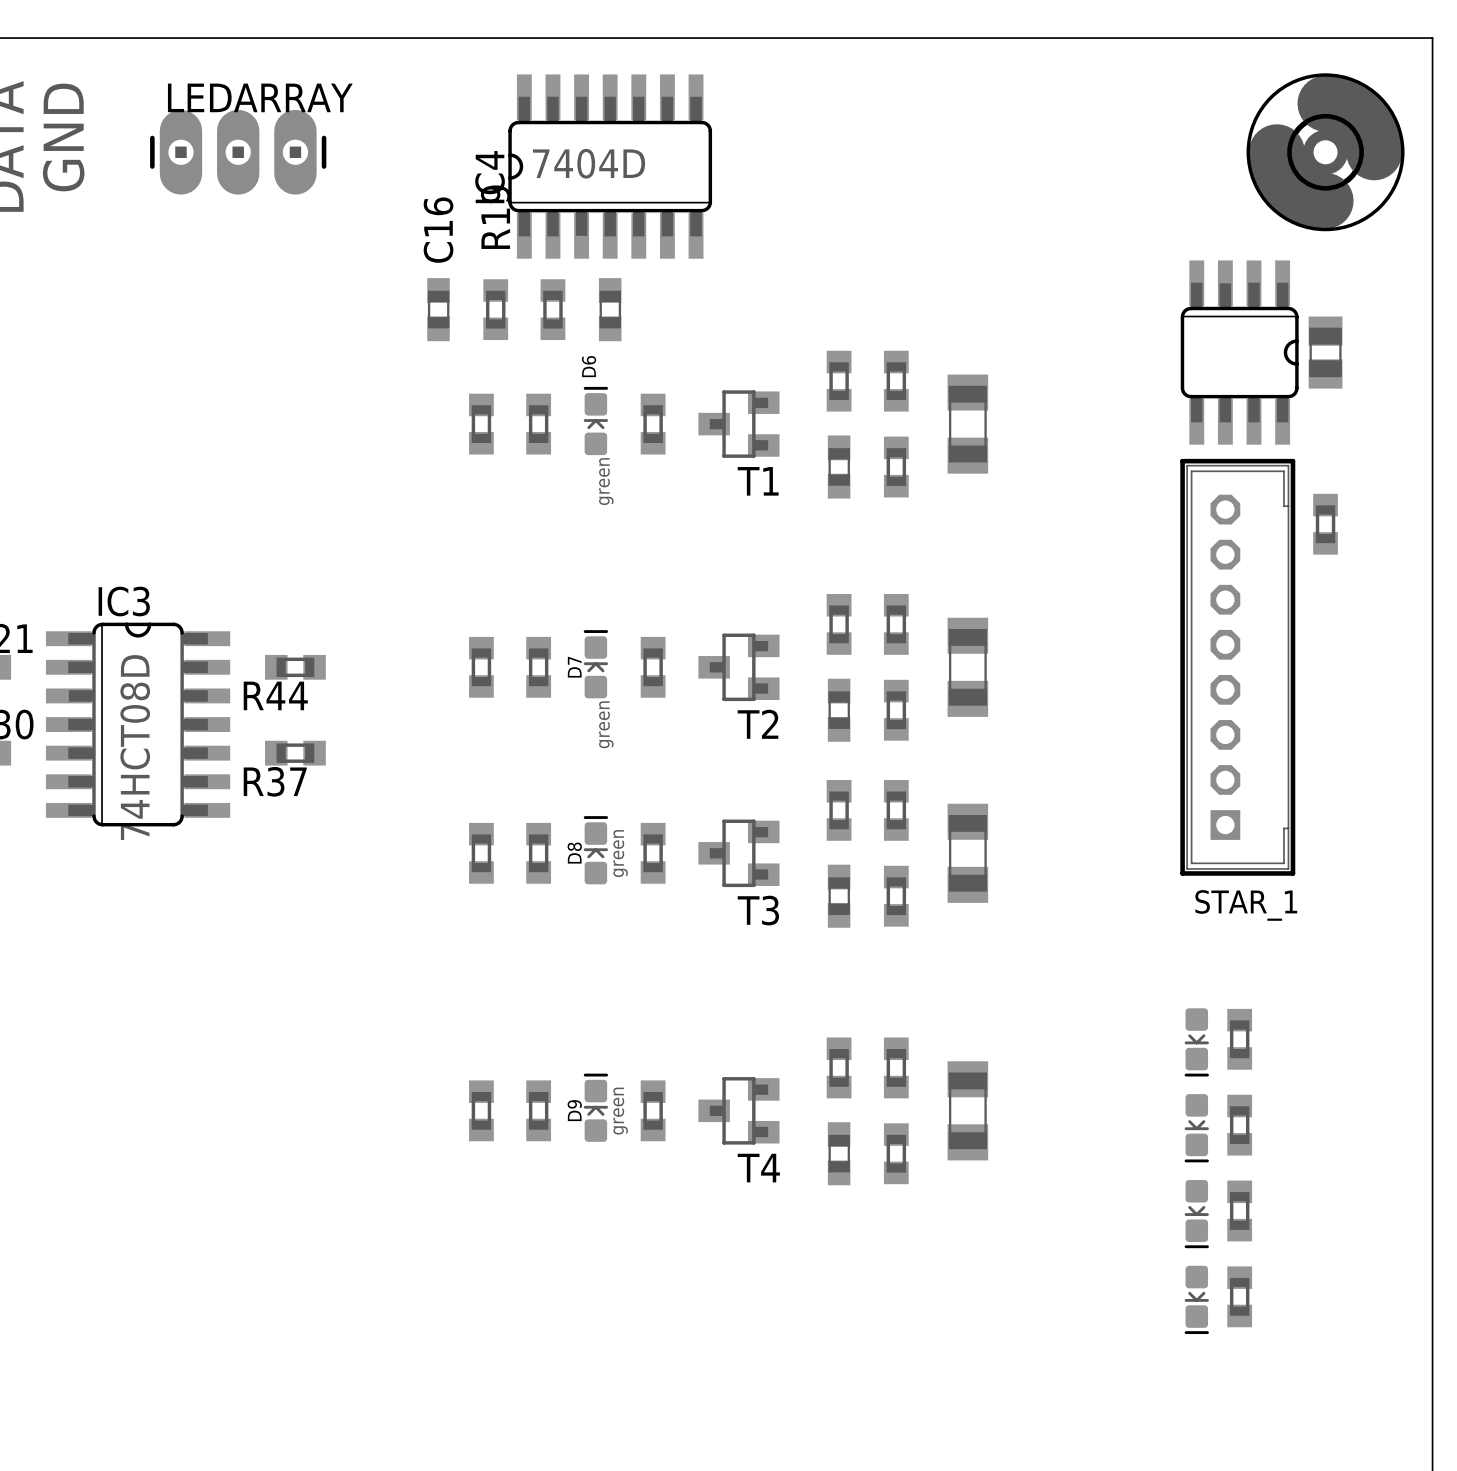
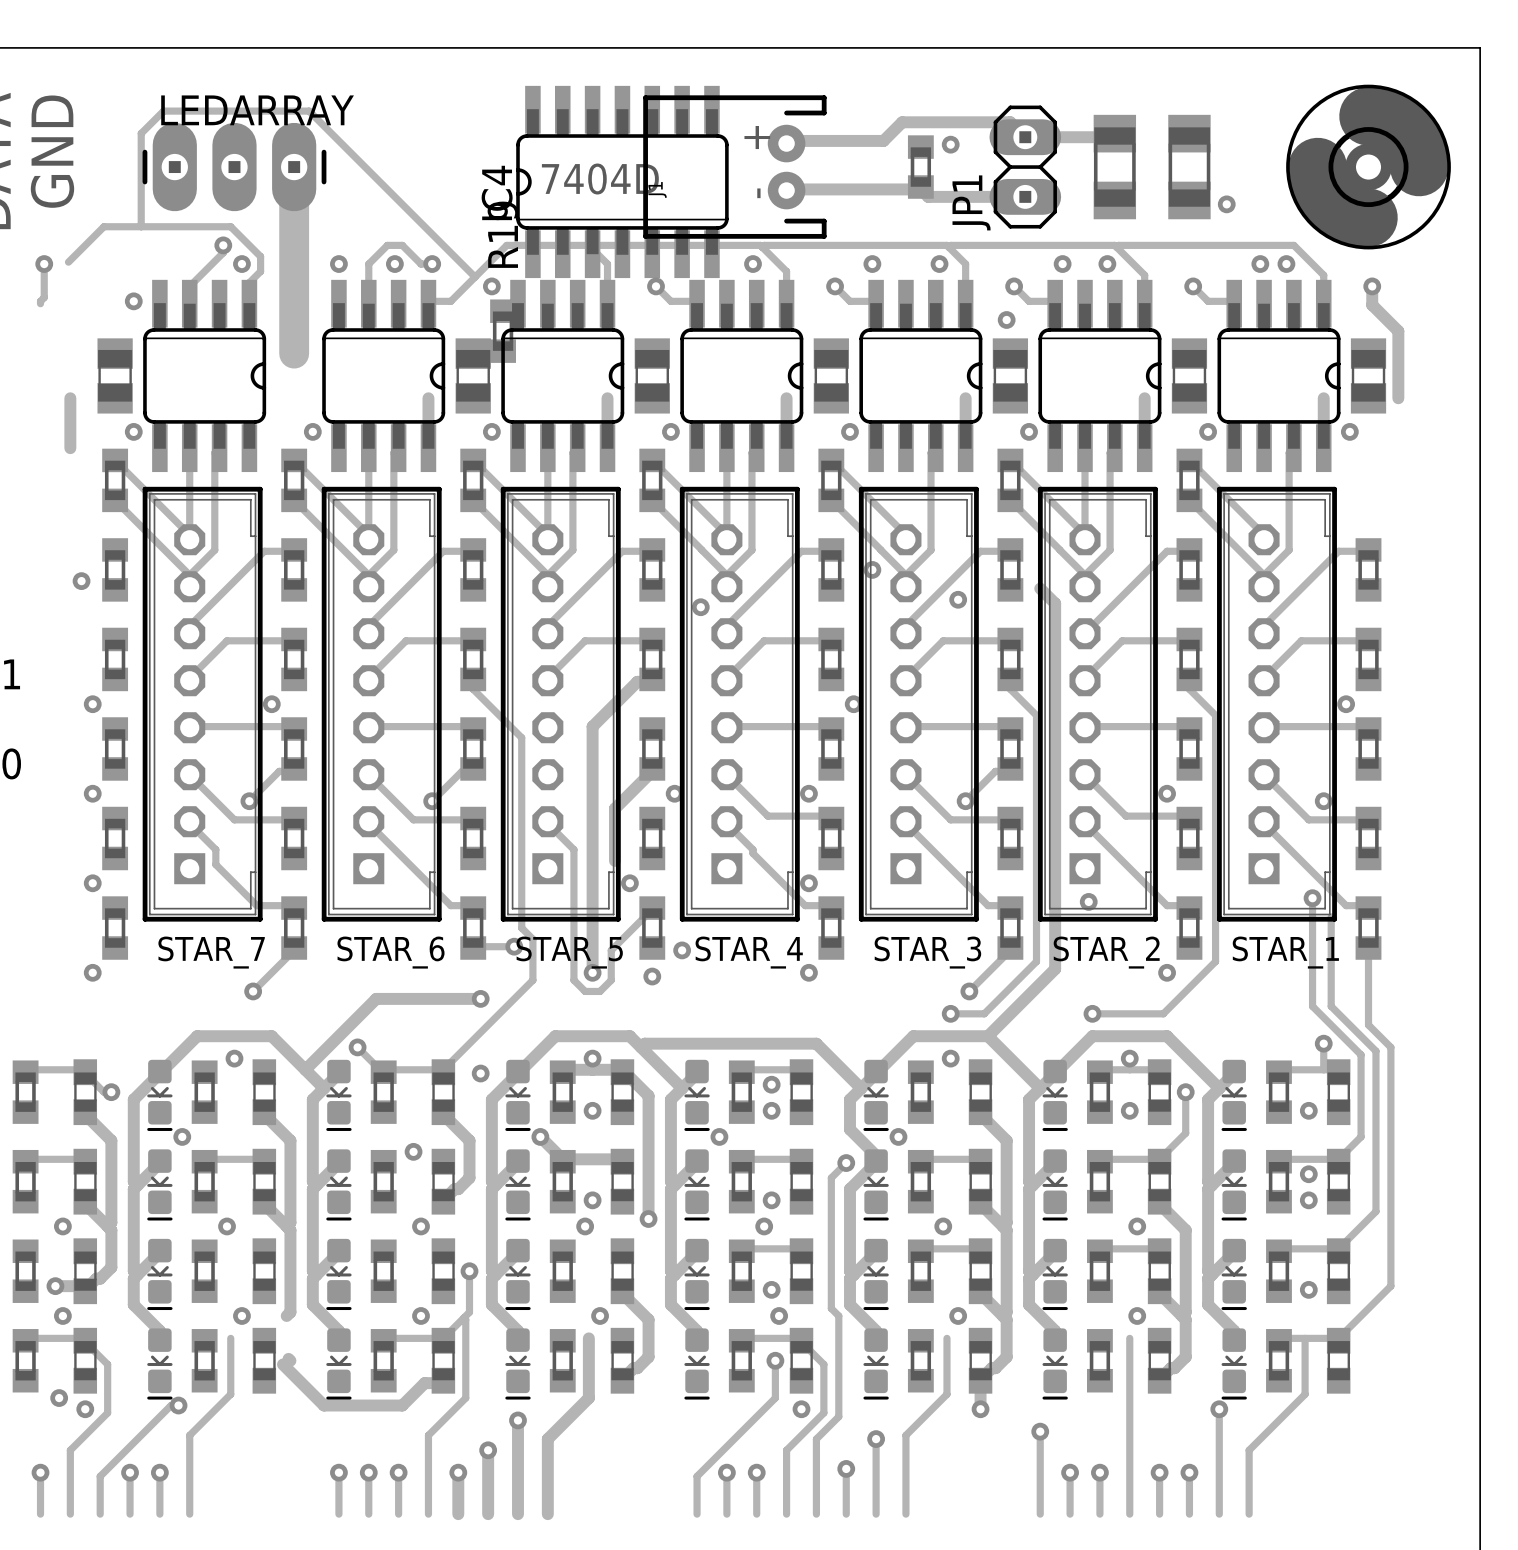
track: none -> (1114, 133) (1111, 137) (1025, 137) (1010, 122) (902, 122) (883, 140) (786, 140) (786, 143)
via: none -> (950, 144)
track: none -> (294, 167) (294, 353)
J1: none -> (734, 167)
part: none -> (920, 167)
JP1: none -> (1025, 167)
part: none -> (1114, 167)
part: none -> (1189, 167)
track: none -> (786, 190) (920, 189) (920, 187) (928, 196) (1025, 196)
via: none -> (1226, 204)
track: none -> (141, 226) (141, 133) (163, 111) (309, 111) (475, 277)
track: none -> (223, 245) (223, 252) (189, 286) (189, 303)
via: none -> (223, 245)
track: none -> (590, 247) (592, 245) (760, 245) (786, 271) (786, 303)
track: none -> (762, 247) (764, 245) (946, 245) (965, 264) (965, 303)
track: none -> (948, 247) (950, 245) (1114, 245) (1144, 275) (1144, 303)
track: none -> (1116, 247) (1118, 245) (1293, 245) (1323, 275) (1323, 303)
track: none -> (68, 262) (103, 226) (230, 226) (260, 256) (260, 271) (249, 282) (249, 303)
track: none -> (44, 264) (44, 297) (40, 303)
via: none -> (44, 264)
via: none -> (241, 264)
via: none -> (338, 264)
via: none -> (394, 264)
track: none -> (432, 264) (421, 264) (402, 245) (387, 245) (368, 264) (368, 303)
via: none -> (432, 264)
via: none -> (753, 264)
via: none -> (872, 264)
via: none -> (939, 264)
via: none -> (1062, 264)
via: none -> (1107, 264)
via: none -> (1260, 264)
via: none -> (1286, 264)
via: none -> (491, 286)
track: none -> (656, 286) (670, 301) (697, 301) (697, 303)
via: none -> (656, 286)
track: none -> (835, 286) (849, 301) (876, 301) (876, 303)
via: none -> (835, 286)
track: none -> (1014, 286) (1029, 301) (1055, 301) (1055, 303)
via: none -> (1014, 286)
track: none -> (1193, 286) (1208, 301) (1234, 301) (1234, 303)
via: none -> (1193, 286)
track: none -> (1372, 286) (1372, 305) (1398, 331) (1398, 398)
via: none -> (1372, 286)
via: none -> (133, 301)
track: none -> (428, 303) (428, 301) (450, 301) (506, 245) (588, 245) (607, 264) (607, 303)
via: none -> (1006, 319)
C16: (438, 309) -> none
part: (552, 309) -> none
part: (610, 309) -> none
part: none -> (115, 375)
part: none -> (204, 375)
part: none -> (383, 375)
part: none -> (473, 375)
part: none -> (562, 375)
part: none -> (652, 375)
part: none -> (741, 375)
part: none -> (831, 375)
part: none -> (920, 375)
part: none -> (1010, 375)
part: none -> (1099, 375)
part: none -> (1189, 375)
track: none -> (70, 398) (70, 448)
track: none -> (428, 398) (428, 448)
track: none -> (607, 398) (607, 448)
track: none -> (786, 398) (786, 448)
track: none -> (965, 398) (965, 448)
track: none -> (1144, 398) (1144, 448)
track: none -> (1323, 398) (1323, 448)
part: (839, 381) -> none
part: (896, 381) -> none
via: none -> (133, 431)
via: none -> (312, 431)
via: none -> (491, 431)
via: none -> (670, 431)
via: none -> (849, 431)
via: none -> (1029, 431)
via: none -> (1208, 431)
via: none -> (1349, 431)
track: none -> (189, 448) (189, 539)
track: none -> (219, 448) (214, 452) (214, 550) (189, 575)
track: none -> (368, 448) (368, 539)
track: none -> (398, 448) (393, 452) (393, 550) (368, 575)
track: none -> (547, 448) (547, 539)
track: none -> (577, 448) (572, 452) (572, 550) (547, 575)
D6: green (595, 421) -> none
track: none -> (726, 448) (726, 539)
track: none -> (756, 448) (751, 452) (751, 550) (726, 575)
track: none -> (935, 448) (931, 452) (931, 550) (905, 575)
track: none -> (1085, 448) (1085, 539)
track: none -> (1114, 448) (1110, 452) (1110, 550) (1085, 575)
track: none -> (1293, 448) (1289, 452) (1289, 550) (1264, 575)
part position: (481, 424) -> (473, 480)
part: (538, 424) -> none
part position: (653, 424) -> (652, 480)
T1: (738, 424) -> none
part: (967, 424) -> none
track: none -> (115, 460) (189, 535)
track: none -> (294, 460) (368, 535)
track: none -> (473, 460) (547, 535)
track: none -> (652, 460) (726, 535)
track: none -> (831, 460) (905, 535)
track: none -> (1010, 460) (1085, 535)
track: none -> (1189, 460) (1264, 535)
part: none -> (115, 480)
part: none -> (294, 480)
part: none -> (831, 480)
part: none -> (1010, 480)
part: none -> (1189, 480)
part: (839, 467) -> none
part: (896, 467) -> none
track: none -> (115, 500) (189, 575)
track: none -> (294, 500) (368, 575)
track: none -> (473, 500) (547, 575)
track: none -> (652, 500) (701, 549)
track: none -> (831, 500) (880, 549)
track: none -> (1010, 500) (1059, 549)
track: none -> (1189, 500) (1264, 575)
track: none -> (294, 549) (264, 551) (189, 625) (189, 633)
track: none -> (473, 549) (443, 551) (368, 625) (368, 633)
track: none -> (652, 549) (622, 551) (547, 625) (547, 633)
track: none -> (701, 550) (726, 575)
track: none -> (831, 549) (801, 551) (726, 625) (726, 633)
track: none -> (880, 550) (905, 575)
track: none -> (1010, 549) (980, 551) (905, 625) (905, 633)
track: none -> (1059, 550) (1085, 575)
track: none -> (1189, 549) (1167, 551) (1085, 633)
track: none -> (1368, 549) (1338, 551) (1264, 625) (1264, 633)
part position: (1325, 524) -> (1368, 569)
part: none -> (115, 569)
part: none -> (294, 569)
part: none -> (473, 569)
part: none -> (652, 569)
part: none -> (831, 569)
via: none -> (872, 569)
part: none -> (1010, 569)
part: none -> (1189, 569)
via: none -> (81, 581)
track: none -> (1040, 588) (1055, 603) (1055, 969) (988, 1036)
via: none -> (958, 599)
via: none -> (700, 607)
track: none -> (294, 639) (227, 640) (189, 678) (189, 680)
track: none -> (473, 639) (406, 640) (368, 678) (368, 680)
track: none -> (652, 639) (585, 640) (547, 678) (547, 680)
track: none -> (831, 639) (764, 640) (726, 678) (726, 680)
track: none -> (1010, 639) (943, 640) (905, 678) (905, 680)
track: none -> (1189, 639) (1122, 640) (1085, 678) (1085, 680)
track: none -> (1368, 639) (1301, 640) (1264, 678) (1264, 680)
part: none -> (115, 659)
part: none -> (294, 659)
part: none -> (473, 659)
part: none -> (652, 659)
part position: (839, 624) -> (831, 659)
part: (896, 624) -> none
part: none -> (1010, 659)
part: none -> (1189, 659)
part: none -> (1368, 659)
track: none -> (473, 679) (473, 689) (521, 737) (521, 928) (532, 939) (532, 980) (443, 1069)
track: none -> (652, 679) (652, 681) (637, 681) (592, 726) (592, 972)
track: none -> (1010, 679) (1010, 689) (1036, 715) (1036, 961) (984, 1013) (950, 1013)
track: none -> (1189, 679) (1189, 689) (1215, 715) (1215, 961) (1163, 1013) (1092, 1013)
D7: green (595, 664) -> none
via: none -> (92, 704)
STAR_7: none -> (202, 704)
via: none -> (271, 704)
R44: (295, 667) -> none
STAR_6: none -> (381, 704)
part: (481, 667) -> none
part: (538, 667) -> none
STAR_5: none -> (560, 704)
part: (653, 667) -> none
STAR_4: none -> (739, 704)
T2: (738, 667) -> none
via: none -> (853, 704)
STAR_3: none -> (918, 704)
part: (967, 667) -> none
STAR_2: none -> (1097, 704)
via: none -> (1346, 704)
track: none -> (189, 727) (294, 726) (294, 729)
track: none -> (368, 727) (473, 726) (473, 729)
track: none -> (726, 727) (831, 726) (831, 729)
track: none -> (905, 727) (1010, 726) (1010, 729)
track: none -> (1085, 727) (1189, 726) (1189, 729)
track: none -> (1264, 727) (1368, 726) (1368, 729)
part: none -> (115, 748)
part: none -> (294, 748)
part: none -> (473, 748)
part: none -> (652, 748)
part: none -> (831, 748)
part: (839, 710) -> none
part: (896, 710) -> none
part: none -> (1010, 748)
part: none -> (1189, 748)
part: none -> (1368, 748)
IC3: 74HCT08D (138, 724) -> none
track: none -> (294, 768) (294, 771) (279, 771) (249, 801)
track: none -> (473, 768) (473, 771) (462, 771) (432, 801)
track: none -> (652, 768) (652, 771) (614, 808) (614, 860)
track: none -> (1010, 768) (1010, 771) (995, 771) (965, 801)
track: none -> (189, 775) (234, 819) (294, 818)
track: none -> (368, 775) (413, 819) (473, 818)
track: none -> (726, 775) (767, 816) (831, 816) (831, 818)
track: none -> (905, 775) (950, 819) (1010, 818)
track: none -> (1085, 775) (1126, 816) (1189, 816) (1189, 818)
track: none -> (1264, 775) (1308, 819) (1368, 818)
via: none -> (92, 793)
R37: (295, 753) -> none
via: none -> (674, 793)
via: none -> (808, 793)
via: none -> (1167, 793)
via: none -> (249, 801)
via: none -> (432, 801)
via: none -> (965, 801)
via: none -> (1323, 801)
track: none -> (189, 821) (215, 849) (215, 864) (256, 905) (294, 905) (294, 908)
track: none -> (368, 821) (450, 905) (473, 905) (473, 908)
track: none -> (547, 821) (573, 849) (573, 980) (585, 991) (600, 991) (611, 980) (611, 950) (652, 908)
track: none -> (726, 821) (753, 849) (753, 853) (805, 905) (831, 905) (831, 908)
track: none -> (905, 821) (988, 905) (1010, 905) (1010, 908)
track: none -> (1085, 821) (1167, 905) (1189, 905) (1189, 908)
track: none -> (1264, 821) (1346, 905) (1368, 905) (1368, 908)
part: none -> (115, 838)
part: none -> (294, 838)
part: none -> (473, 838)
part: none -> (652, 838)
part: none -> (1010, 838)
part: none -> (1189, 838)
part: none -> (1368, 838)
part position: (839, 810) -> (831, 838)
part: (896, 810) -> none
via: none -> (92, 883)
via: none -> (629, 883)
via: none -> (808, 883)
D8: green (595, 850) -> none
part: (481, 853) -> none
part: (538, 853) -> none
part: (653, 853) -> none
T3: (738, 853) -> none
part: (967, 853) -> none
track: none -> (1312, 898) (1312, 1006) (1361, 1054) (1361, 1136) (1338, 1159)
via: none -> (1312, 898)
via: none -> (1088, 901)
track: none -> (1331, 916) (1331, 1006) (1375, 1051) (1375, 1211) (1338, 1248)
part: none -> (115, 928)
part: none -> (294, 928)
part: none -> (473, 928)
part: none -> (652, 928)
part: none -> (831, 928)
part: none -> (1010, 928)
part: none -> (1189, 928)
part: none -> (1368, 928)
part: (839, 896) -> none
part: (896, 896) -> none
track: none -> (514, 946) (473, 948)
via: none -> (514, 946)
track: none -> (294, 948) (294, 950) (253, 991)
track: none -> (1010, 948) (1010, 950) (969, 991)
track: none -> (1368, 948) (1368, 1025) (1390, 1047) (1390, 1286) (1338, 1338)
via: none -> (682, 950)
via: none -> (92, 972)
via: none -> (592, 972)
via: none -> (808, 972)
via: none -> (1167, 972)
via: none -> (652, 976)
via: none -> (253, 991)
via: none -> (969, 991)
track: none -> (480, 998) (376, 998) (305, 1069)
via: none -> (480, 998)
via: none -> (950, 1013)
via: none -> (1092, 1013)
track: none -> (988, 1036) (913, 1036) (849, 1099) (849, 1129) (876, 1155) (876, 1163) (849, 1189) (849, 1271) (853, 1274)
track: none -> (988, 1036) (1040, 1088)
track: none -> (1323, 1043) (1323, 1069)
via: none -> (1323, 1043)
track: none -> (357, 1047) (383, 1073) (383, 1069) (443, 1069)
via: none -> (357, 1047)
track: none -> (641, 1047) (644, 1043) (816, 1043) (861, 1088)
via: none -> (234, 1058)
via: none -> (592, 1058)
via: none -> (950, 1058)
via: none -> (1129, 1058)
track: none -> (338, 1071) (312, 1099) (312, 1181) (316, 1185)
track: none -> (697, 1071) (670, 1099) (670, 1181) (674, 1185)
track: none -> (1234, 1071) (1208, 1099) (1208, 1181) (1211, 1185)
track: none -> (25, 1072) (25, 1069) (85, 1069) (85, 1073) (103, 1092) (111, 1092)
track: none -> (562, 1072) (562, 1069) (622, 1069) (622, 1072) (626, 1073) (648, 1095) (648, 1219)
track: none -> (741, 1072) (741, 1069) (801, 1069) (801, 1072)
track: none -> (1099, 1072) (1099, 1069) (1159, 1069) (1159, 1072)
track: none -> (1278, 1072) (1278, 1069) (1338, 1069) (1338, 1072)
via: none -> (480, 1073)
via: none -> (771, 1084)
track: none -> (324, 1088) (271, 1036) (197, 1036) (133, 1099) (133, 1181) (137, 1185)
track: none -> (682, 1088) (629, 1036) (555, 1036) (491, 1099) (491, 1181) (495, 1185)
track: none -> (1219, 1088) (1167, 1036) (1092, 1036) (1029, 1099) (1029, 1181) (1032, 1185)
part: none -> (25, 1092)
part: none -> (85, 1092)
via: none -> (111, 1092)
part: none -> (204, 1092)
part: none -> (264, 1092)
part: none -> (383, 1092)
part: none -> (443, 1092)
part: none -> (562, 1092)
part: none -> (622, 1092)
part: none -> (741, 1092)
part: none -> (801, 1092)
part: none -> (920, 1092)
part: none -> (980, 1092)
part: none -> (1099, 1092)
part: none -> (1159, 1092)
track: none -> (1185, 1092) (1185, 1133) (1159, 1159)
via: none -> (1185, 1092)
part: none -> (1338, 1092)
part: none -> (159, 1095)
part: none -> (338, 1095)
part: none -> (517, 1095)
part: none -> (697, 1095)
part: none -> (876, 1095)
part: none -> (1055, 1095)
via: none -> (592, 1110)
via: none -> (771, 1110)
via: none -> (1129, 1110)
via: none -> (1308, 1110)
track: none -> (85, 1112) (85, 1114) (111, 1140) (111, 1222) (107, 1226)
track: none -> (264, 1112) (264, 1114) (290, 1140) (290, 1222) (286, 1226)
track: none -> (443, 1112) (443, 1114) (469, 1140) (469, 1177) (458, 1189) (454, 1189) (443, 1201)
track: none -> (980, 1112) (980, 1114) (1006, 1140) (1006, 1222) (1002, 1226)
part footprint: [947, 1061, 989, 1161] -> [968, 1148, 993, 1215]
part: (839, 1067) -> none
part: (896, 1067) -> none
via: none -> (182, 1136)
track: none -> (540, 1136) (562, 1161) (562, 1159) (622, 1159) (622, 1161)
via: none -> (540, 1136)
via: none -> (719, 1136)
via: none -> (898, 1136)
via: none -> (413, 1151)
track: none -> (1159, 1159) (1099, 1159) (1099, 1161)
track: none -> (1338, 1159) (1278, 1159) (1278, 1161)
track: none -> (25, 1161) (25, 1159) (85, 1159) (85, 1161)
track: none -> (159, 1161) (133, 1189) (133, 1271) (137, 1274)
track: none -> (204, 1161) (204, 1159) (264, 1159) (264, 1161)
track: none -> (338, 1161) (312, 1189) (312, 1271) (316, 1274)
track: none -> (517, 1161) (491, 1189) (491, 1271) (495, 1274)
track: none -> (697, 1161) (670, 1189) (670, 1271) (674, 1274)
track: none -> (741, 1161) (741, 1159) (801, 1159) (801, 1161)
track: none -> (920, 1161) (920, 1159) (980, 1159) (980, 1161)
track: none -> (1055, 1161) (1029, 1189) (1029, 1271) (1032, 1274)
track: none -> (1234, 1161) (1208, 1189) (1208, 1271) (1211, 1274)
D9: green (595, 1107) -> none
track: none -> (846, 1163) (831, 1177) (831, 1308) (838, 1315) (838, 1416) (816, 1439) (816, 1514)
via: none -> (846, 1163)
part: (481, 1110) -> none
part position: (538, 1110) -> (562, 1181)
part: (653, 1110) -> none
T4: (738, 1110) -> none
via: none -> (1308, 1174)
part: none -> (25, 1181)
part: none -> (85, 1181)
part: none -> (204, 1181)
part: none -> (264, 1181)
part: none -> (383, 1181)
part: none -> (443, 1181)
part: none -> (622, 1181)
part: none -> (741, 1181)
part: none -> (801, 1181)
part: none -> (920, 1181)
part: none -> (1099, 1181)
part: none -> (1159, 1181)
part: none -> (1338, 1181)
part: none -> (159, 1184)
part: none -> (338, 1184)
part: none -> (517, 1184)
part: none -> (697, 1184)
part: none -> (876, 1184)
part: none -> (1055, 1184)
via: none -> (592, 1200)
via: none -> (771, 1200)
via: none -> (1308, 1200)
track: none -> (85, 1201) (85, 1204) (111, 1230) (111, 1267) (100, 1278) (96, 1278) (85, 1291) (81, 1286) (55, 1286)
track: none -> (264, 1201) (264, 1204) (290, 1230) (290, 1312) (286, 1315)
track: none -> (980, 1201) (980, 1204) (1006, 1230) (1006, 1312) (1002, 1315)
track: none -> (1159, 1201) (1159, 1204) (1185, 1230) (1185, 1312) (1181, 1315)
part: (839, 1153) -> none
part: (896, 1153) -> none
via: none -> (648, 1219)
via: none -> (62, 1226)
via: none -> (227, 1226)
via: none -> (421, 1226)
via: none -> (585, 1226)
via: none -> (764, 1226)
via: none -> (943, 1226)
via: none -> (1137, 1226)
track: none -> (1338, 1248) (1278, 1248) (1278, 1251)
track: none -> (159, 1250) (133, 1278) (133, 1304) (159, 1330) (159, 1340)
track: none -> (338, 1250) (312, 1278) (312, 1304) (338, 1330) (338, 1340)
track: none -> (517, 1250) (491, 1278) (491, 1304) (517, 1330) (517, 1340)
track: none -> (697, 1250) (670, 1278) (670, 1304) (697, 1330) (697, 1340)
track: none -> (741, 1251) (741, 1248) (801, 1248) (801, 1251)
track: none -> (876, 1250) (849, 1278) (849, 1304) (876, 1330) (876, 1340)
track: none -> (920, 1251) (920, 1248) (980, 1248) (980, 1251)
track: none -> (1055, 1250) (1029, 1278) (1029, 1304) (1055, 1330) (1055, 1340)
track: none -> (1099, 1251) (1099, 1248) (1159, 1248) (1159, 1251)
track: none -> (1234, 1250) (1208, 1278) (1208, 1304) (1234, 1330) (1234, 1340)
part: none -> (25, 1271)
part: none -> (85, 1271)
part: none -> (204, 1271)
part: none -> (264, 1271)
part: none -> (383, 1271)
part: none -> (443, 1271)
track: none -> (469, 1271) (469, 1312) (443, 1338)
via: none -> (469, 1271)
part: none -> (562, 1271)
part: none -> (622, 1271)
part: none -> (741, 1271)
part: none -> (801, 1271)
part: none -> (920, 1271)
part: none -> (980, 1271)
part: none -> (1099, 1271)
part: none -> (1159, 1271)
part: none -> (1338, 1271)
part: none -> (159, 1274)
part: none -> (338, 1274)
part: none -> (517, 1274)
part: none -> (697, 1274)
part: none -> (876, 1274)
part: none -> (1055, 1274)
via: none -> (55, 1286)
via: none -> (771, 1289)
via: none -> (1308, 1289)
track: none -> (622, 1291) (622, 1293) (648, 1319) (648, 1357) (637, 1368) (633, 1368) (622, 1380)
track: none -> (980, 1291) (980, 1293) (1006, 1319) (1006, 1357) (980, 1379) (980, 1409)
track: none -> (1159, 1291) (1159, 1293) (1185, 1319) (1185, 1357) (1174, 1368) (1170, 1368) (1159, 1380)
via: none -> (62, 1315)
via: none -> (241, 1315)
via: none -> (421, 1315)
via: none -> (600, 1315)
via: none -> (779, 1315)
via: none -> (958, 1315)
via: none -> (1137, 1315)
track: none -> (463, 1317) (465, 1319) (465, 1398) (428, 1435) (428, 1514)
track: none -> (230, 1338) (230, 1394) (189, 1435) (189, 1514)
track: none -> (443, 1338) (383, 1338) (383, 1340)
track: none -> (588, 1338) (588, 1398) (547, 1439) (547, 1514)
track: none -> (946, 1338) (946, 1394) (905, 1435) (905, 1514)
track: none -> (1129, 1338) (1129, 1514)
track: none -> (1305, 1338) (1305, 1394) (1249, 1450) (1249, 1514)
track: none -> (1338, 1338) (1278, 1338) (1278, 1340)
track: none -> (25, 1340) (25, 1338) (85, 1338) (85, 1342) (107, 1364) (107, 1412) (70, 1450) (70, 1514)
track: none -> (741, 1340) (741, 1338) (801, 1338) (801, 1342) (823, 1364) (823, 1412) (786, 1450) (786, 1514)
track: none -> (288, 1358) (290, 1360)
part: none -> (25, 1360)
part: none -> (85, 1360)
part: none -> (204, 1360)
part: none -> (264, 1360)
part: none -> (383, 1360)
part: none -> (443, 1360)
part: none -> (562, 1360)
part: none -> (622, 1360)
part: none -> (741, 1360)
track: none -> (775, 1360) (775, 1398) (697, 1476) (697, 1514)
via: none -> (775, 1360)
part: none -> (801, 1360)
part: none -> (920, 1360)
part: none -> (980, 1360)
part: none -> (1099, 1360)
part: none -> (1159, 1360)
part: none -> (1338, 1360)
part: none -> (159, 1363)
part: none -> (338, 1363)
part: none -> (517, 1363)
part: none -> (697, 1363)
part: none -> (876, 1363)
part: none -> (1055, 1363)
track: none -> (282, 1364) (324, 1405) (402, 1405) (424, 1383) (443, 1383) (443, 1380)
via: none -> (59, 1398)
track: none -> (178, 1405) (171, 1405) (100, 1476) (100, 1514)
via: none -> (178, 1405)
via: none -> (85, 1409)
via: none -> (801, 1409)
via: none -> (980, 1409)
track: none -> (1219, 1409) (1219, 1514)
via: none -> (1219, 1409)
track: none -> (517, 1420) (517, 1514)
via: none -> (517, 1420)
track: none -> (1040, 1431) (1040, 1514)
via: none -> (1040, 1431)
track: none -> (876, 1439) (876, 1514)
via: none -> (876, 1439)
track: none -> (488, 1450) (488, 1514)
via: none -> (488, 1450)
track: none -> (846, 1468) (846, 1514)
via: none -> (846, 1468)
track: none -> (40, 1472) (40, 1514)
via: none -> (40, 1472)
track: none -> (130, 1472) (130, 1514)
via: none -> (130, 1472)
track: none -> (159, 1472) (159, 1514)
via: none -> (159, 1472)
track: none -> (338, 1472) (338, 1514)
via: none -> (338, 1472)
track: none -> (368, 1472) (368, 1514)
via: none -> (368, 1472)
track: none -> (398, 1472) (398, 1514)
via: none -> (398, 1472)
track: none -> (458, 1472) (458, 1514)
via: none -> (458, 1472)
track: none -> (726, 1472) (726, 1514)
via: none -> (726, 1472)
track: none -> (756, 1472) (756, 1514)
via: none -> (756, 1472)
track: none -> (1070, 1472) (1070, 1514)
via: none -> (1070, 1472)
track: none -> (1099, 1472) (1099, 1514)
via: none -> (1099, 1472)
track: none -> (1159, 1472) (1159, 1514)
via: none -> (1159, 1472)
track: none -> (1189, 1472) (1189, 1514)
via: none -> (1189, 1472)

